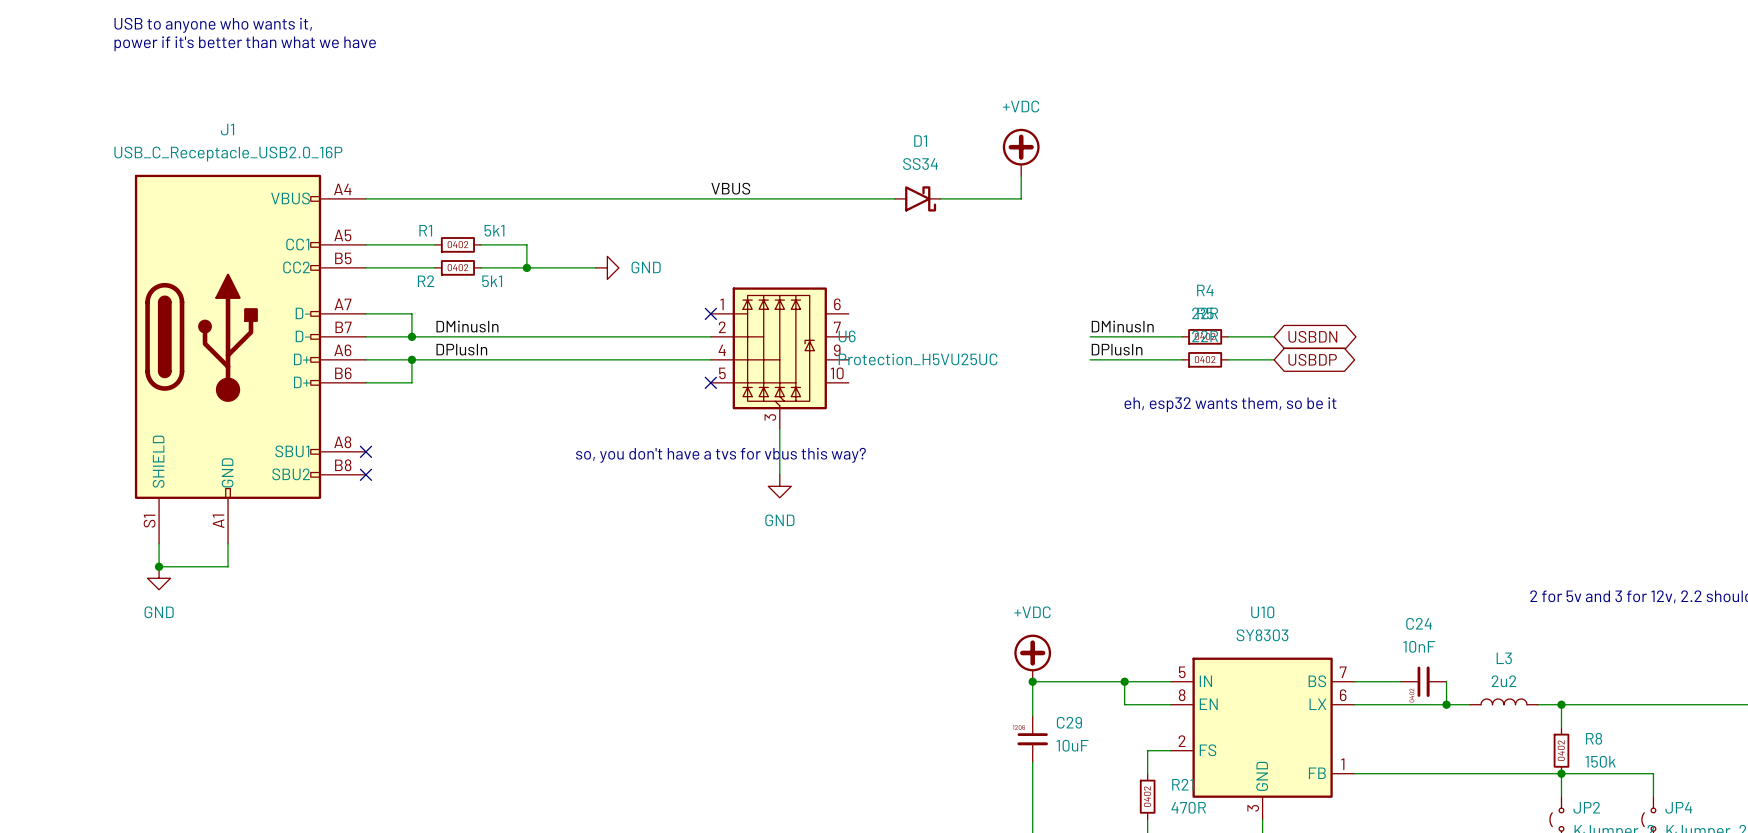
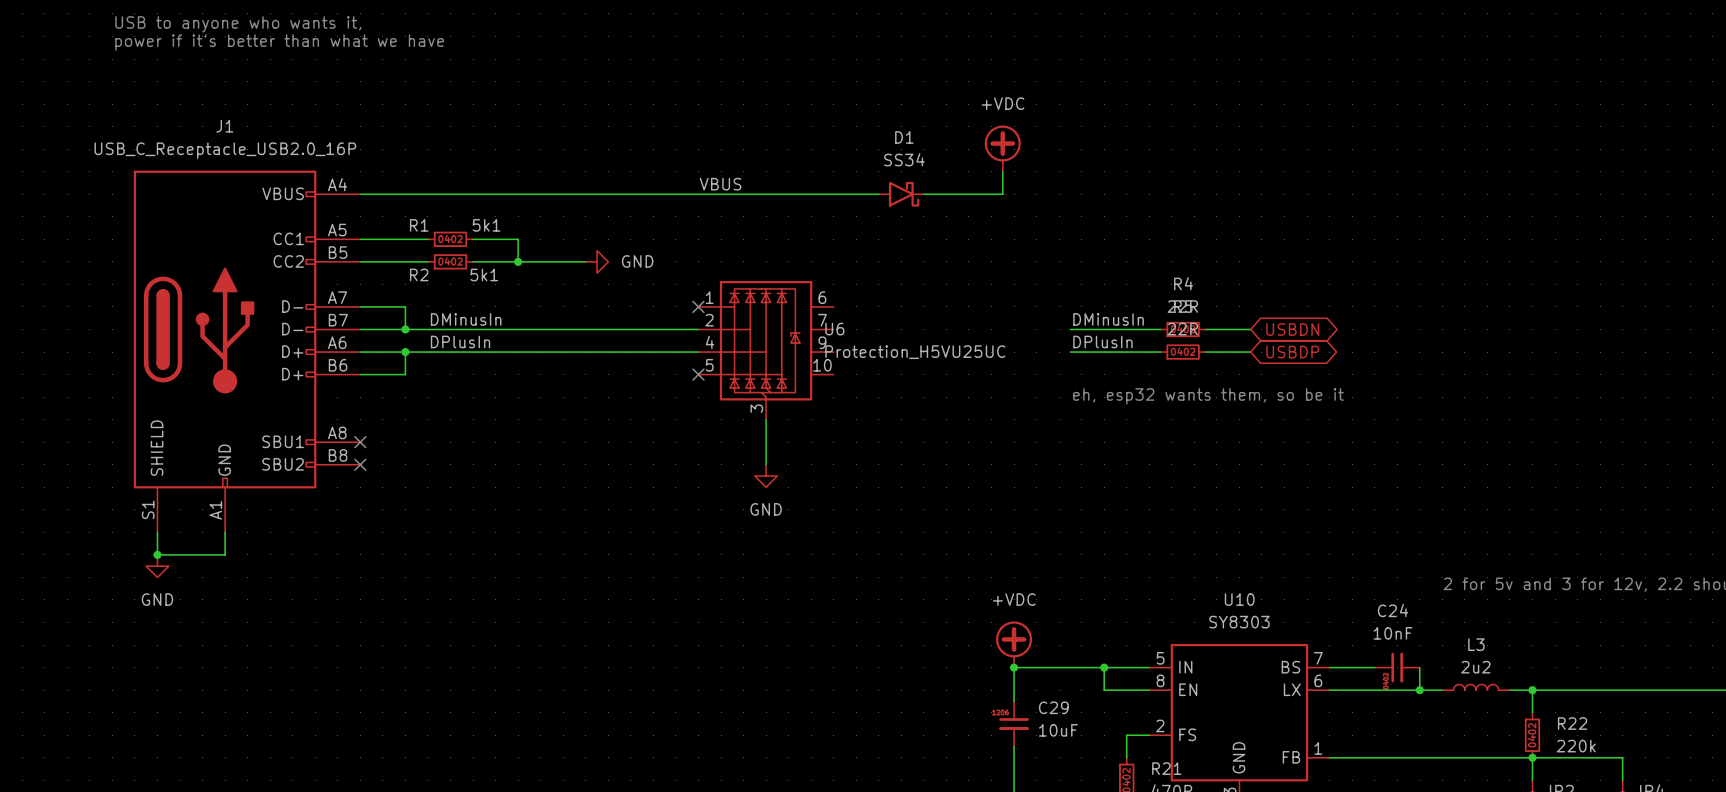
text: so, you don't have a tvs for vbus this way? (720, 455) -> none
R8 name: R8 (1594, 738) -> R22 (1572, 723)
R8 value: 150k (1600, 761) -> 220k (1576, 746)

